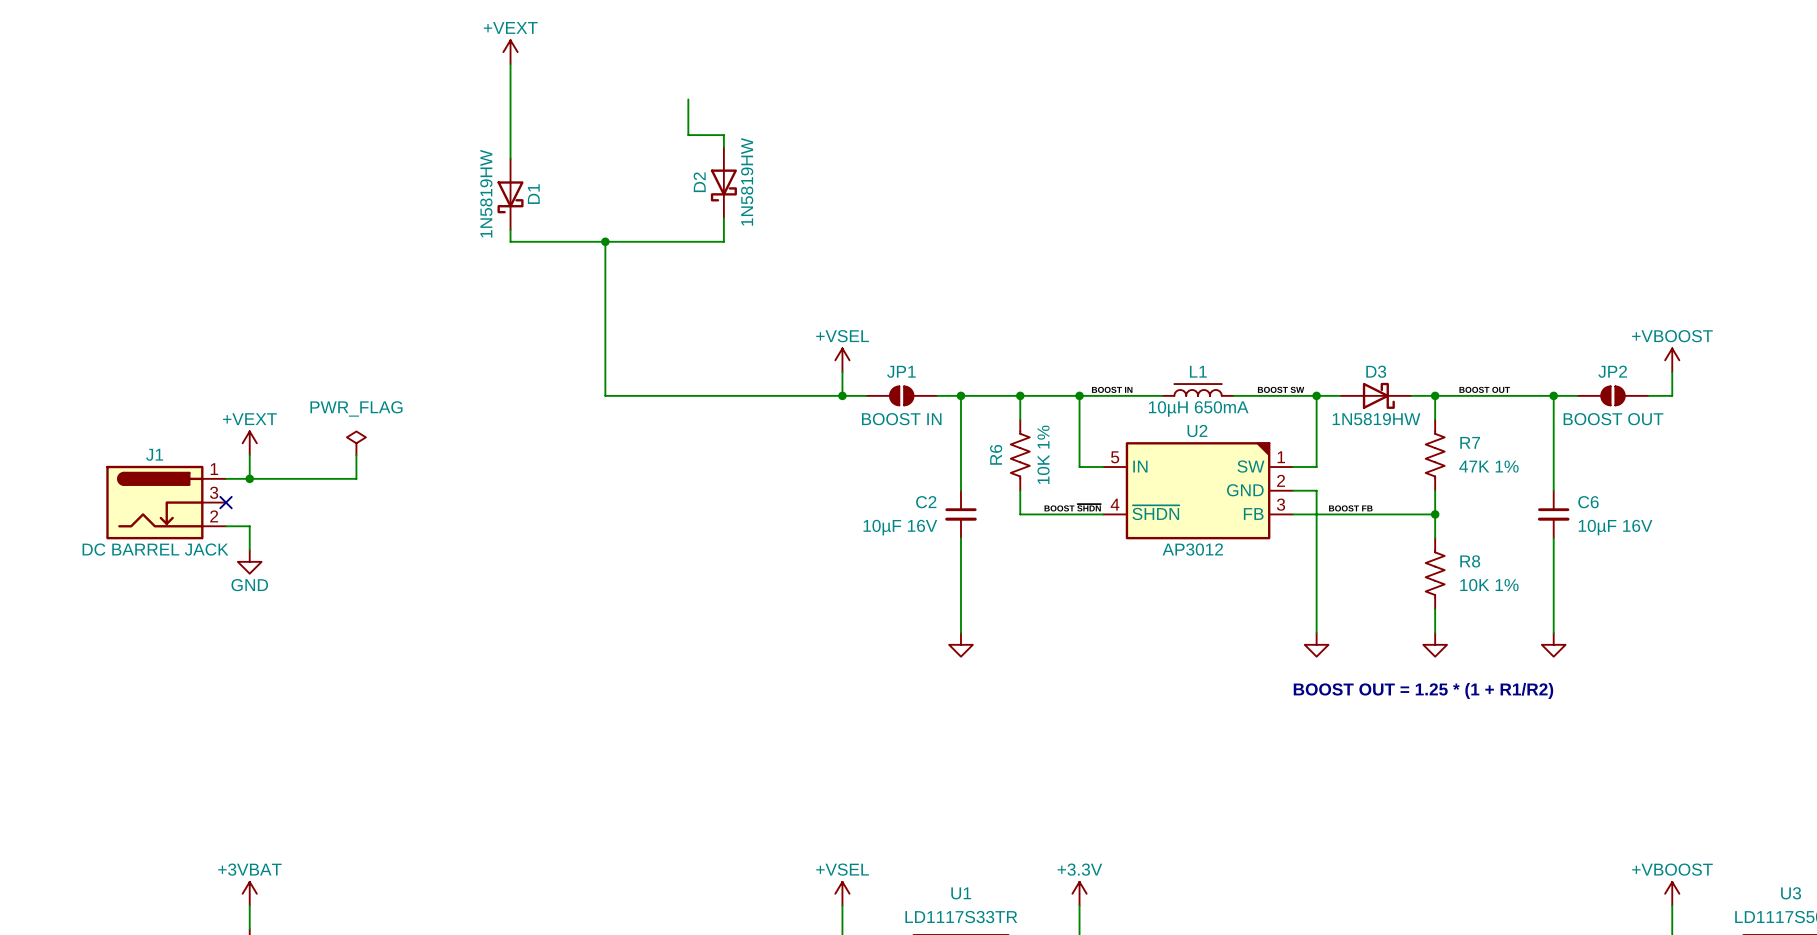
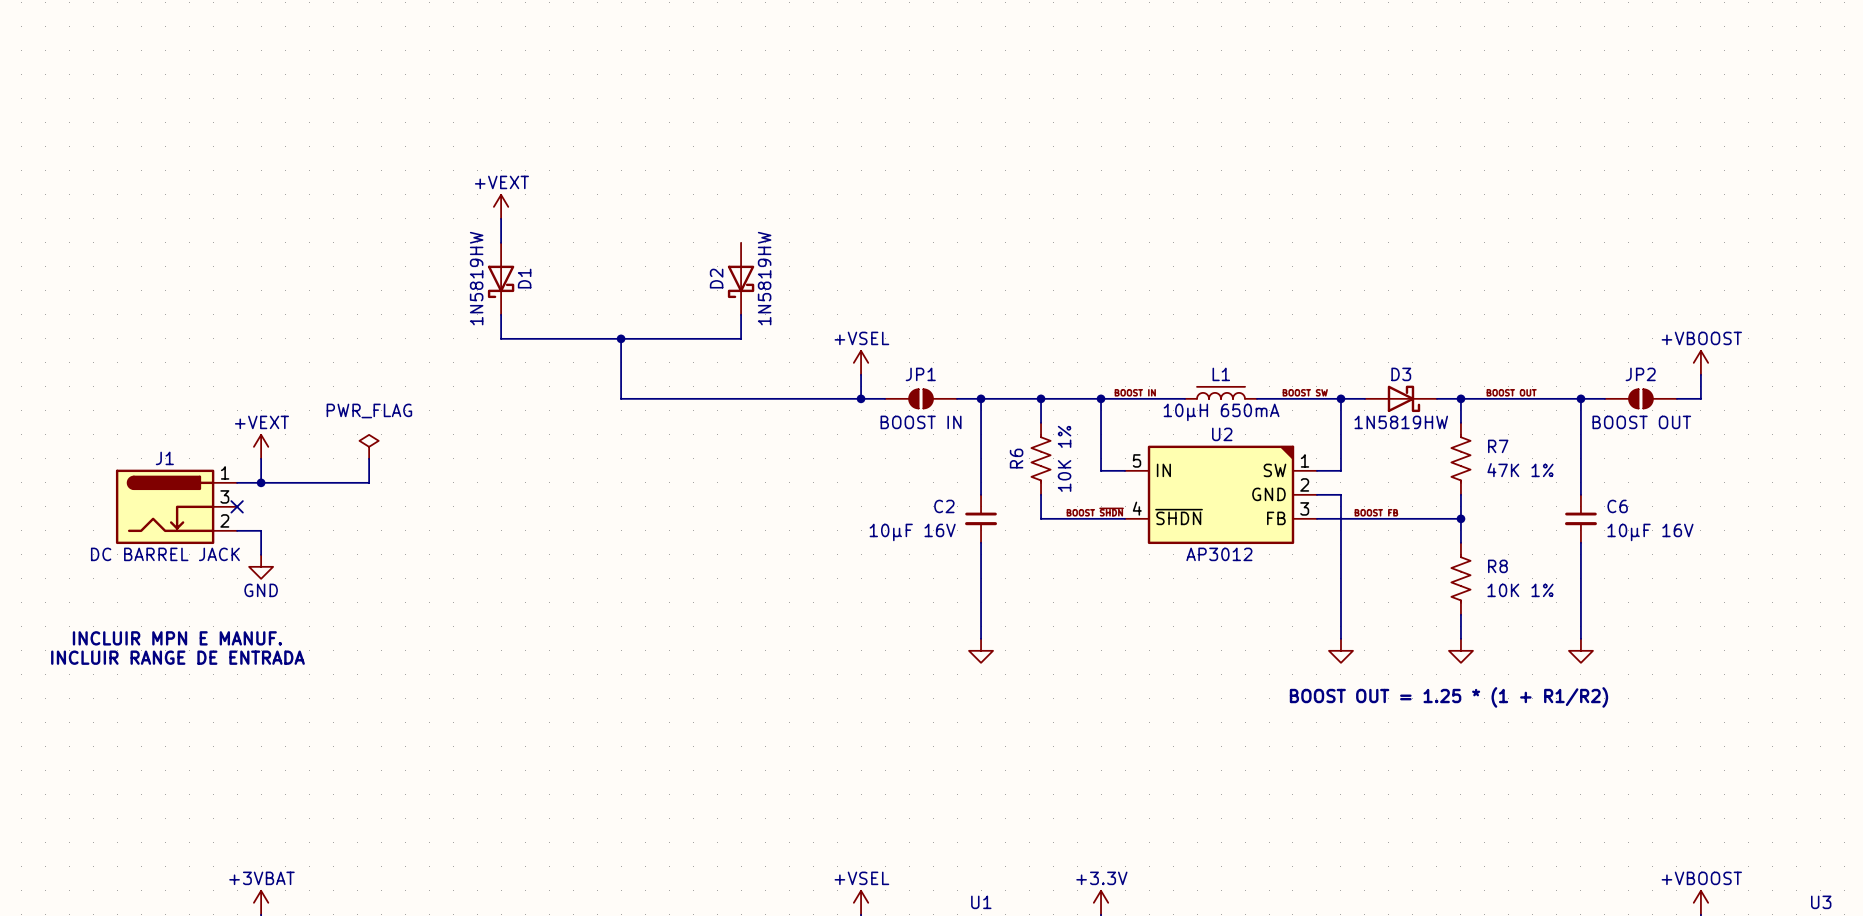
power symbol position: +VEXT (510, 52) -> +VEXT (501, 206)
wire: (510, 63) (510, 158) -> none
wire: (688, 99) (688, 135) (723, 135) (723, 146) -> none
D2 position: (723, 182) -> (741, 278)
D1 position: (510, 194) -> (501, 278)
wire: none -> (501, 218) (501, 242)
wire: (723, 218) (723, 241) (510, 241) (510, 229) -> none
wire: (605, 241) (605, 336) -> none
junction: (605, 241) -> none
wire: none -> (501, 314) (501, 338) (741, 338) (741, 314)
junction: none -> (621, 338)
text: none -> INCLUIR MPN E MANUF. (177, 638)
text: none -> INCLUIR RANGE DE ENTRADA (177, 657)

